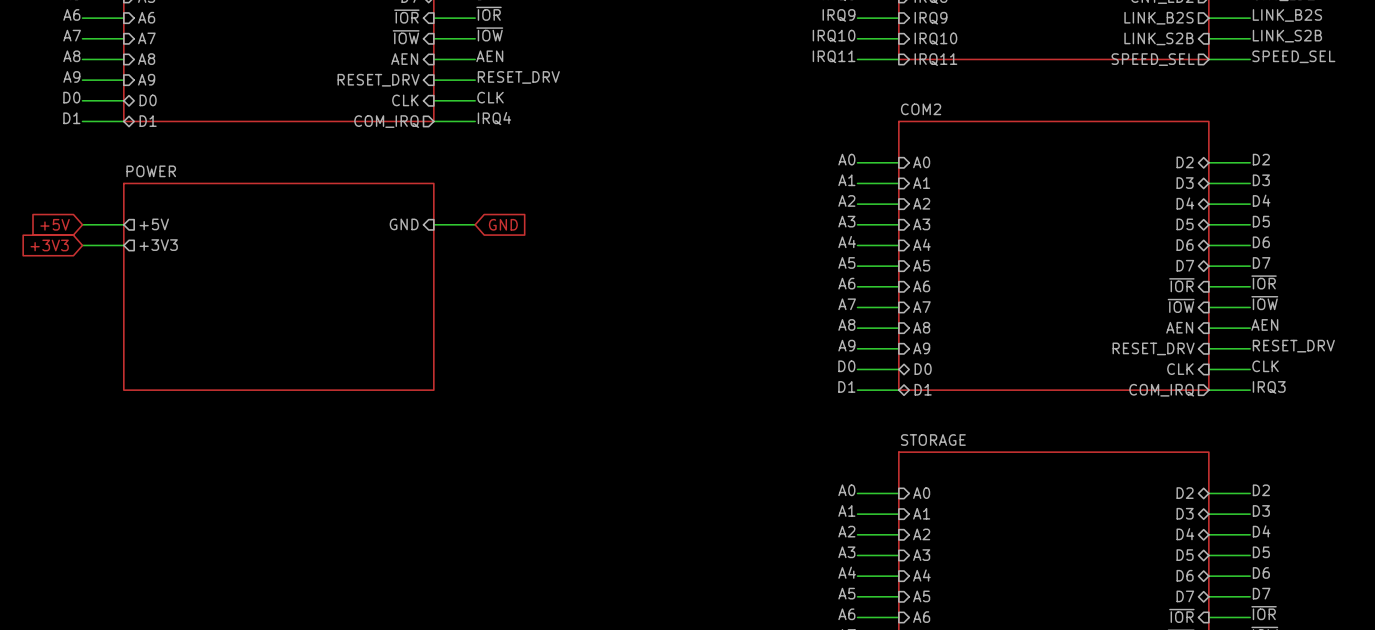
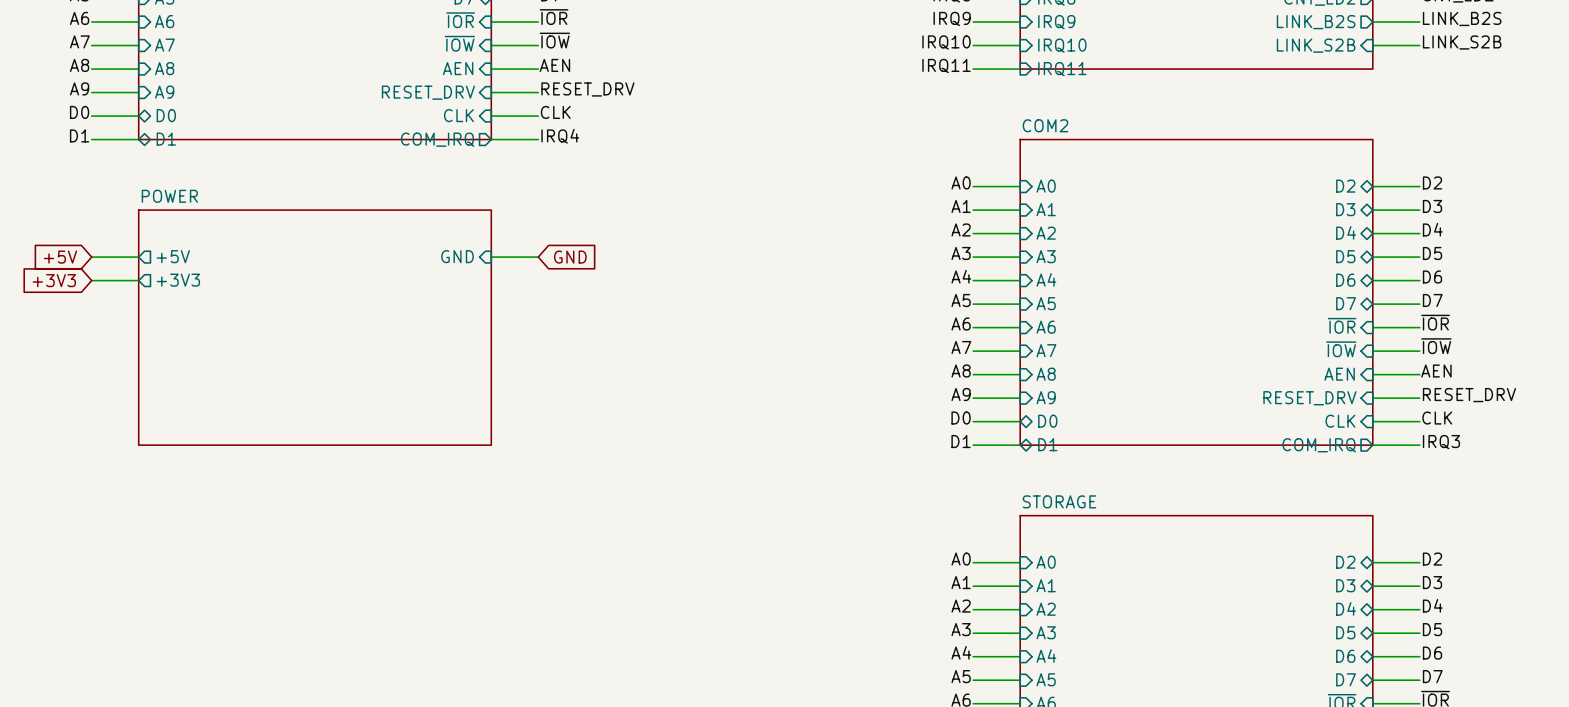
label: SPEED_SEL (1293, 56) -> none
sheet pin: SPEED_SEL (1153, 59) -> none
wire: (1208, 59) (1250, 59) -> none

